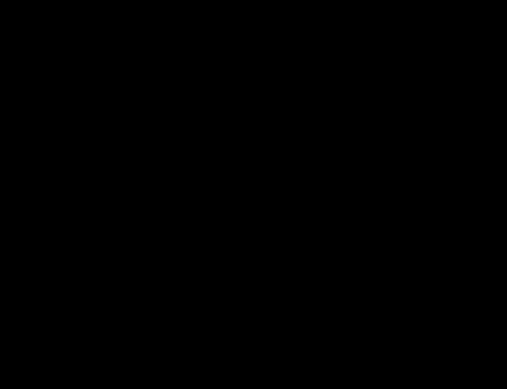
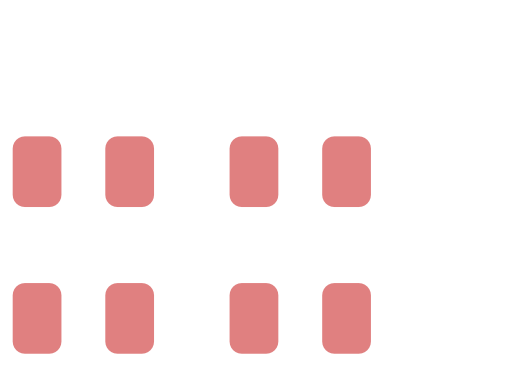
part: none -> (83, 171)
part: none -> (300, 171)
part: none -> (83, 318)
part: none -> (300, 318)

